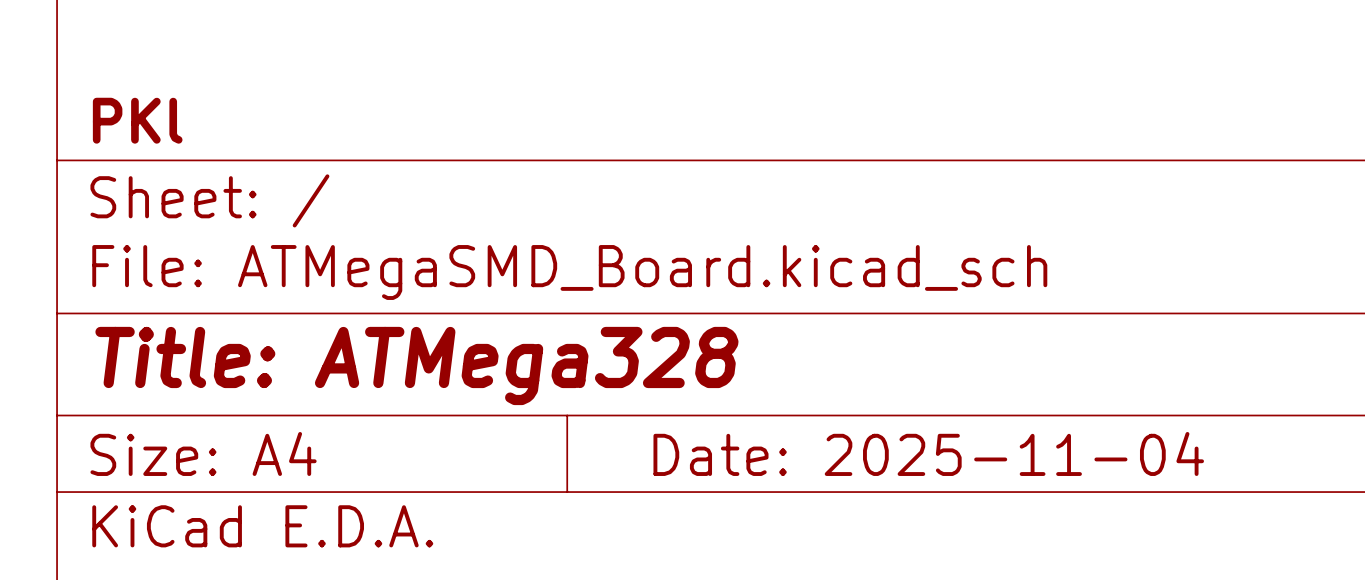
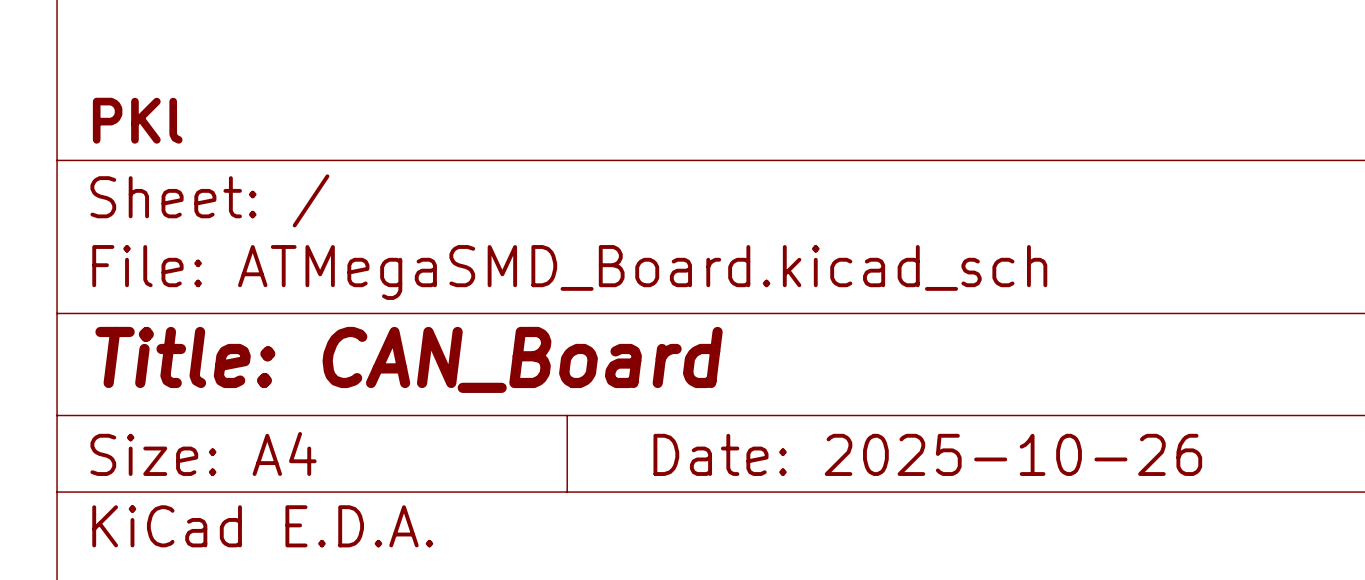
title block: Title: ATMega328 (416, 365) -> Title: CAN_Board (409, 359)
title block: Date: 2025-11-04 (928, 453) -> Date: 2025-10-26 (927, 454)

